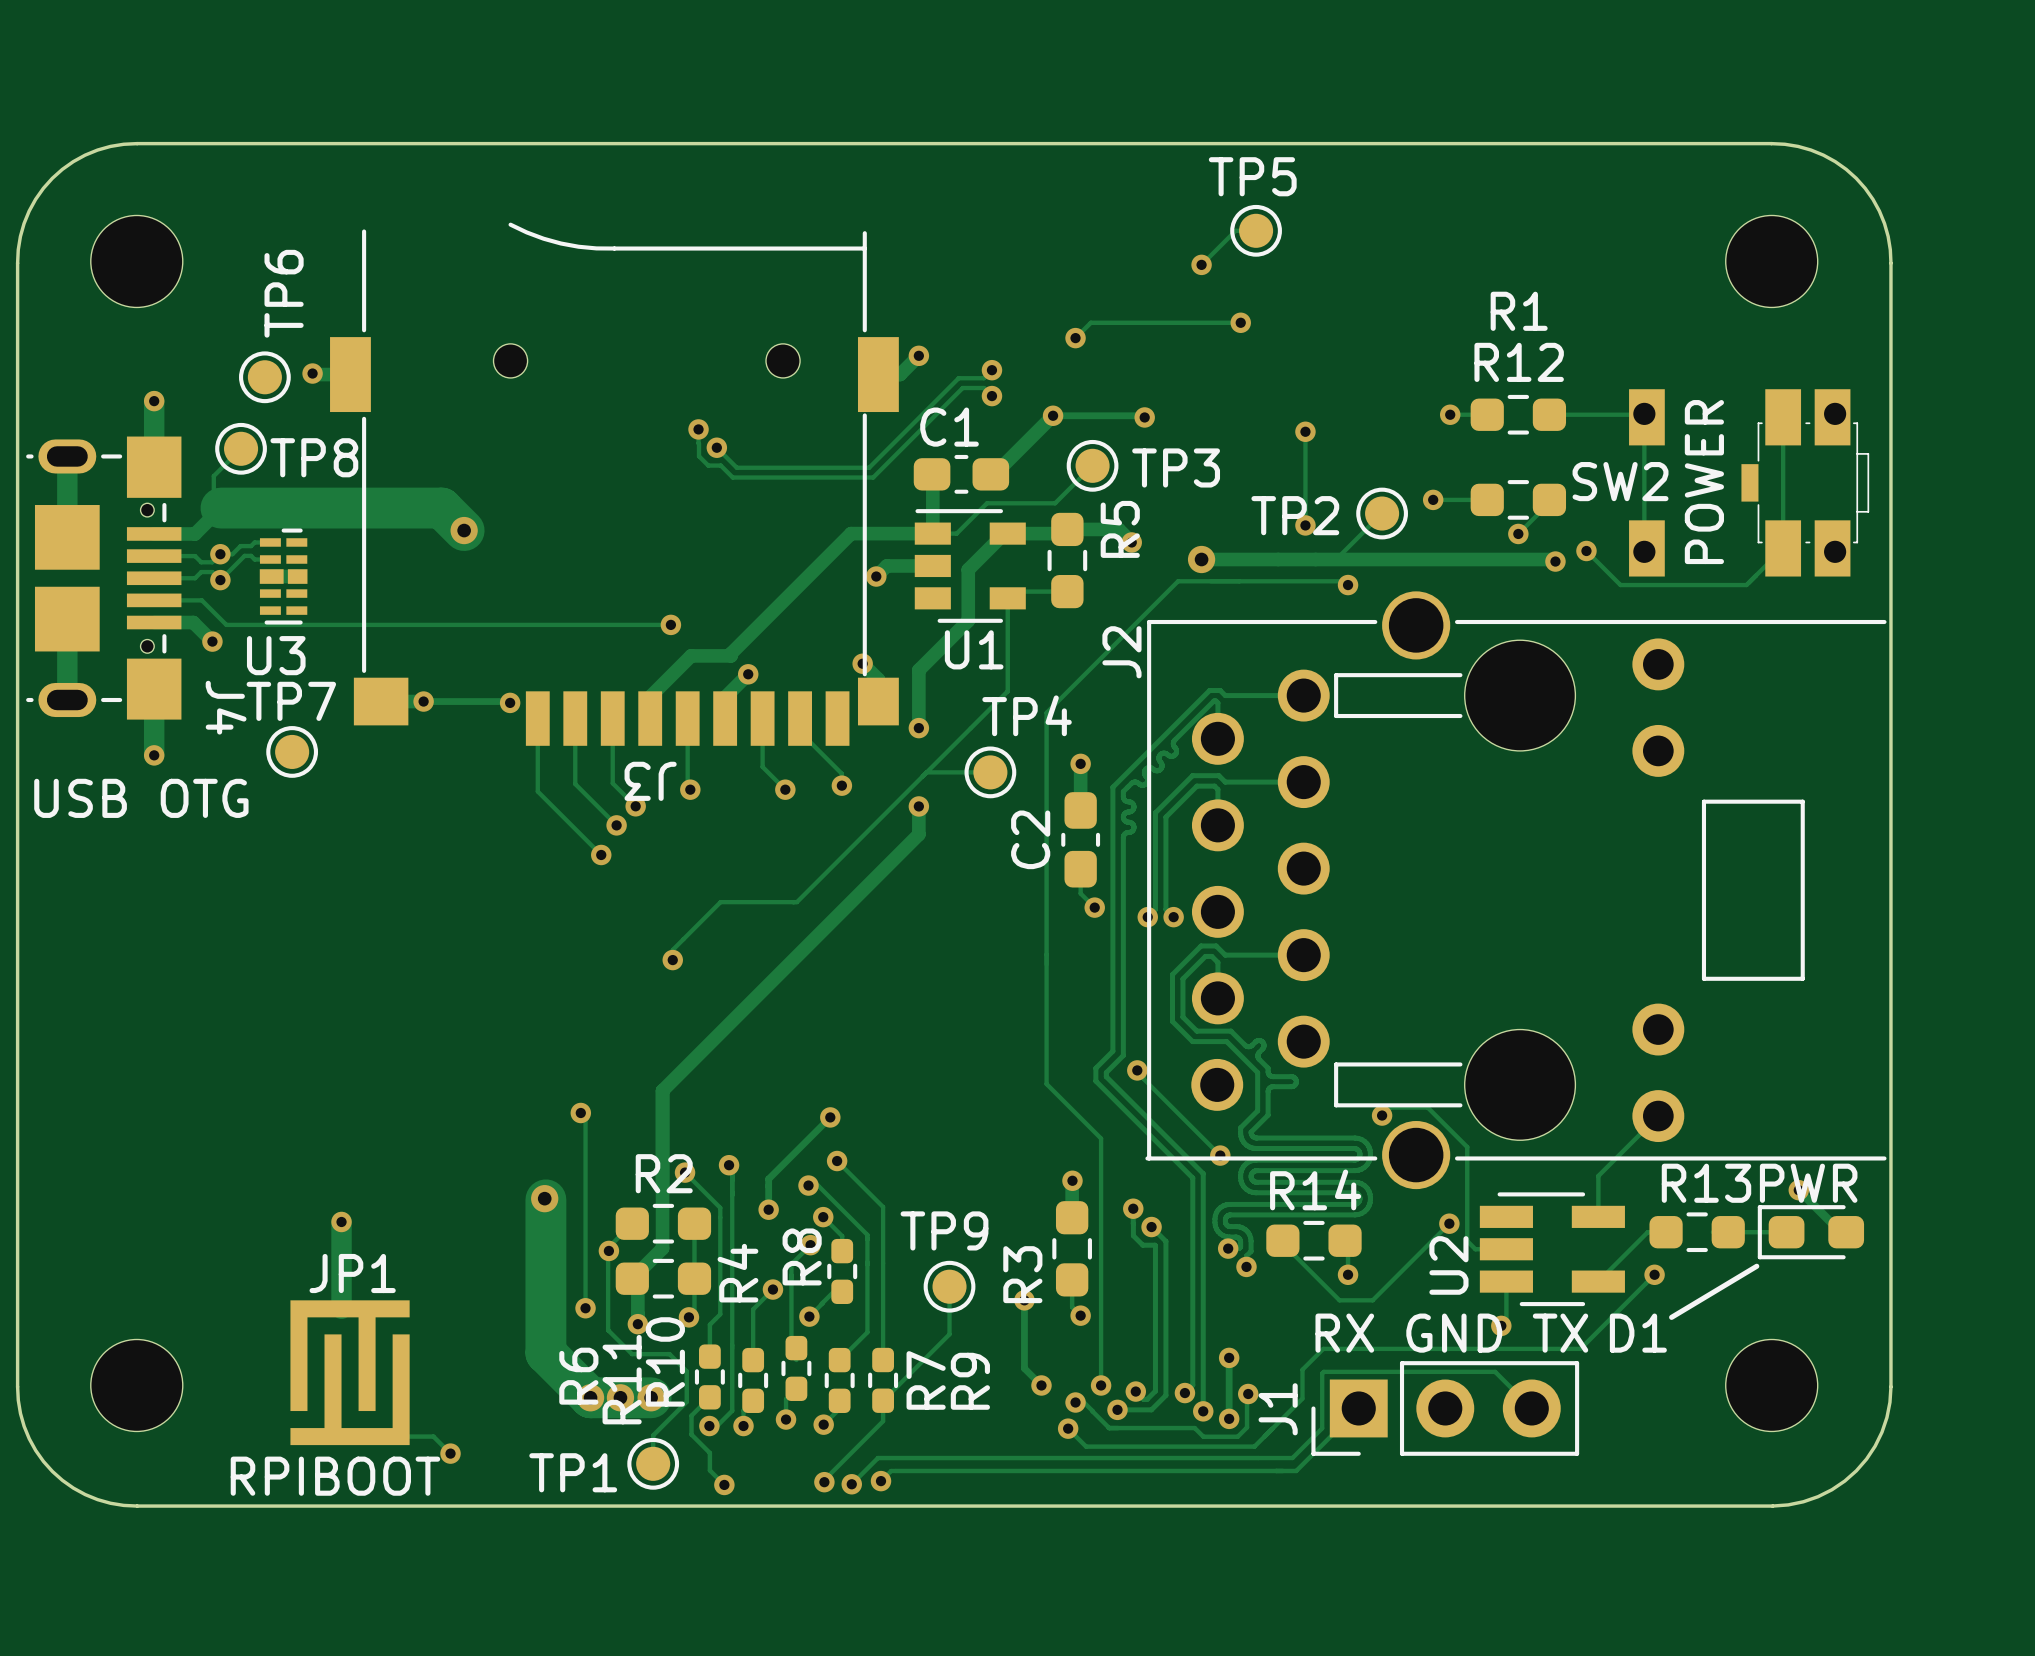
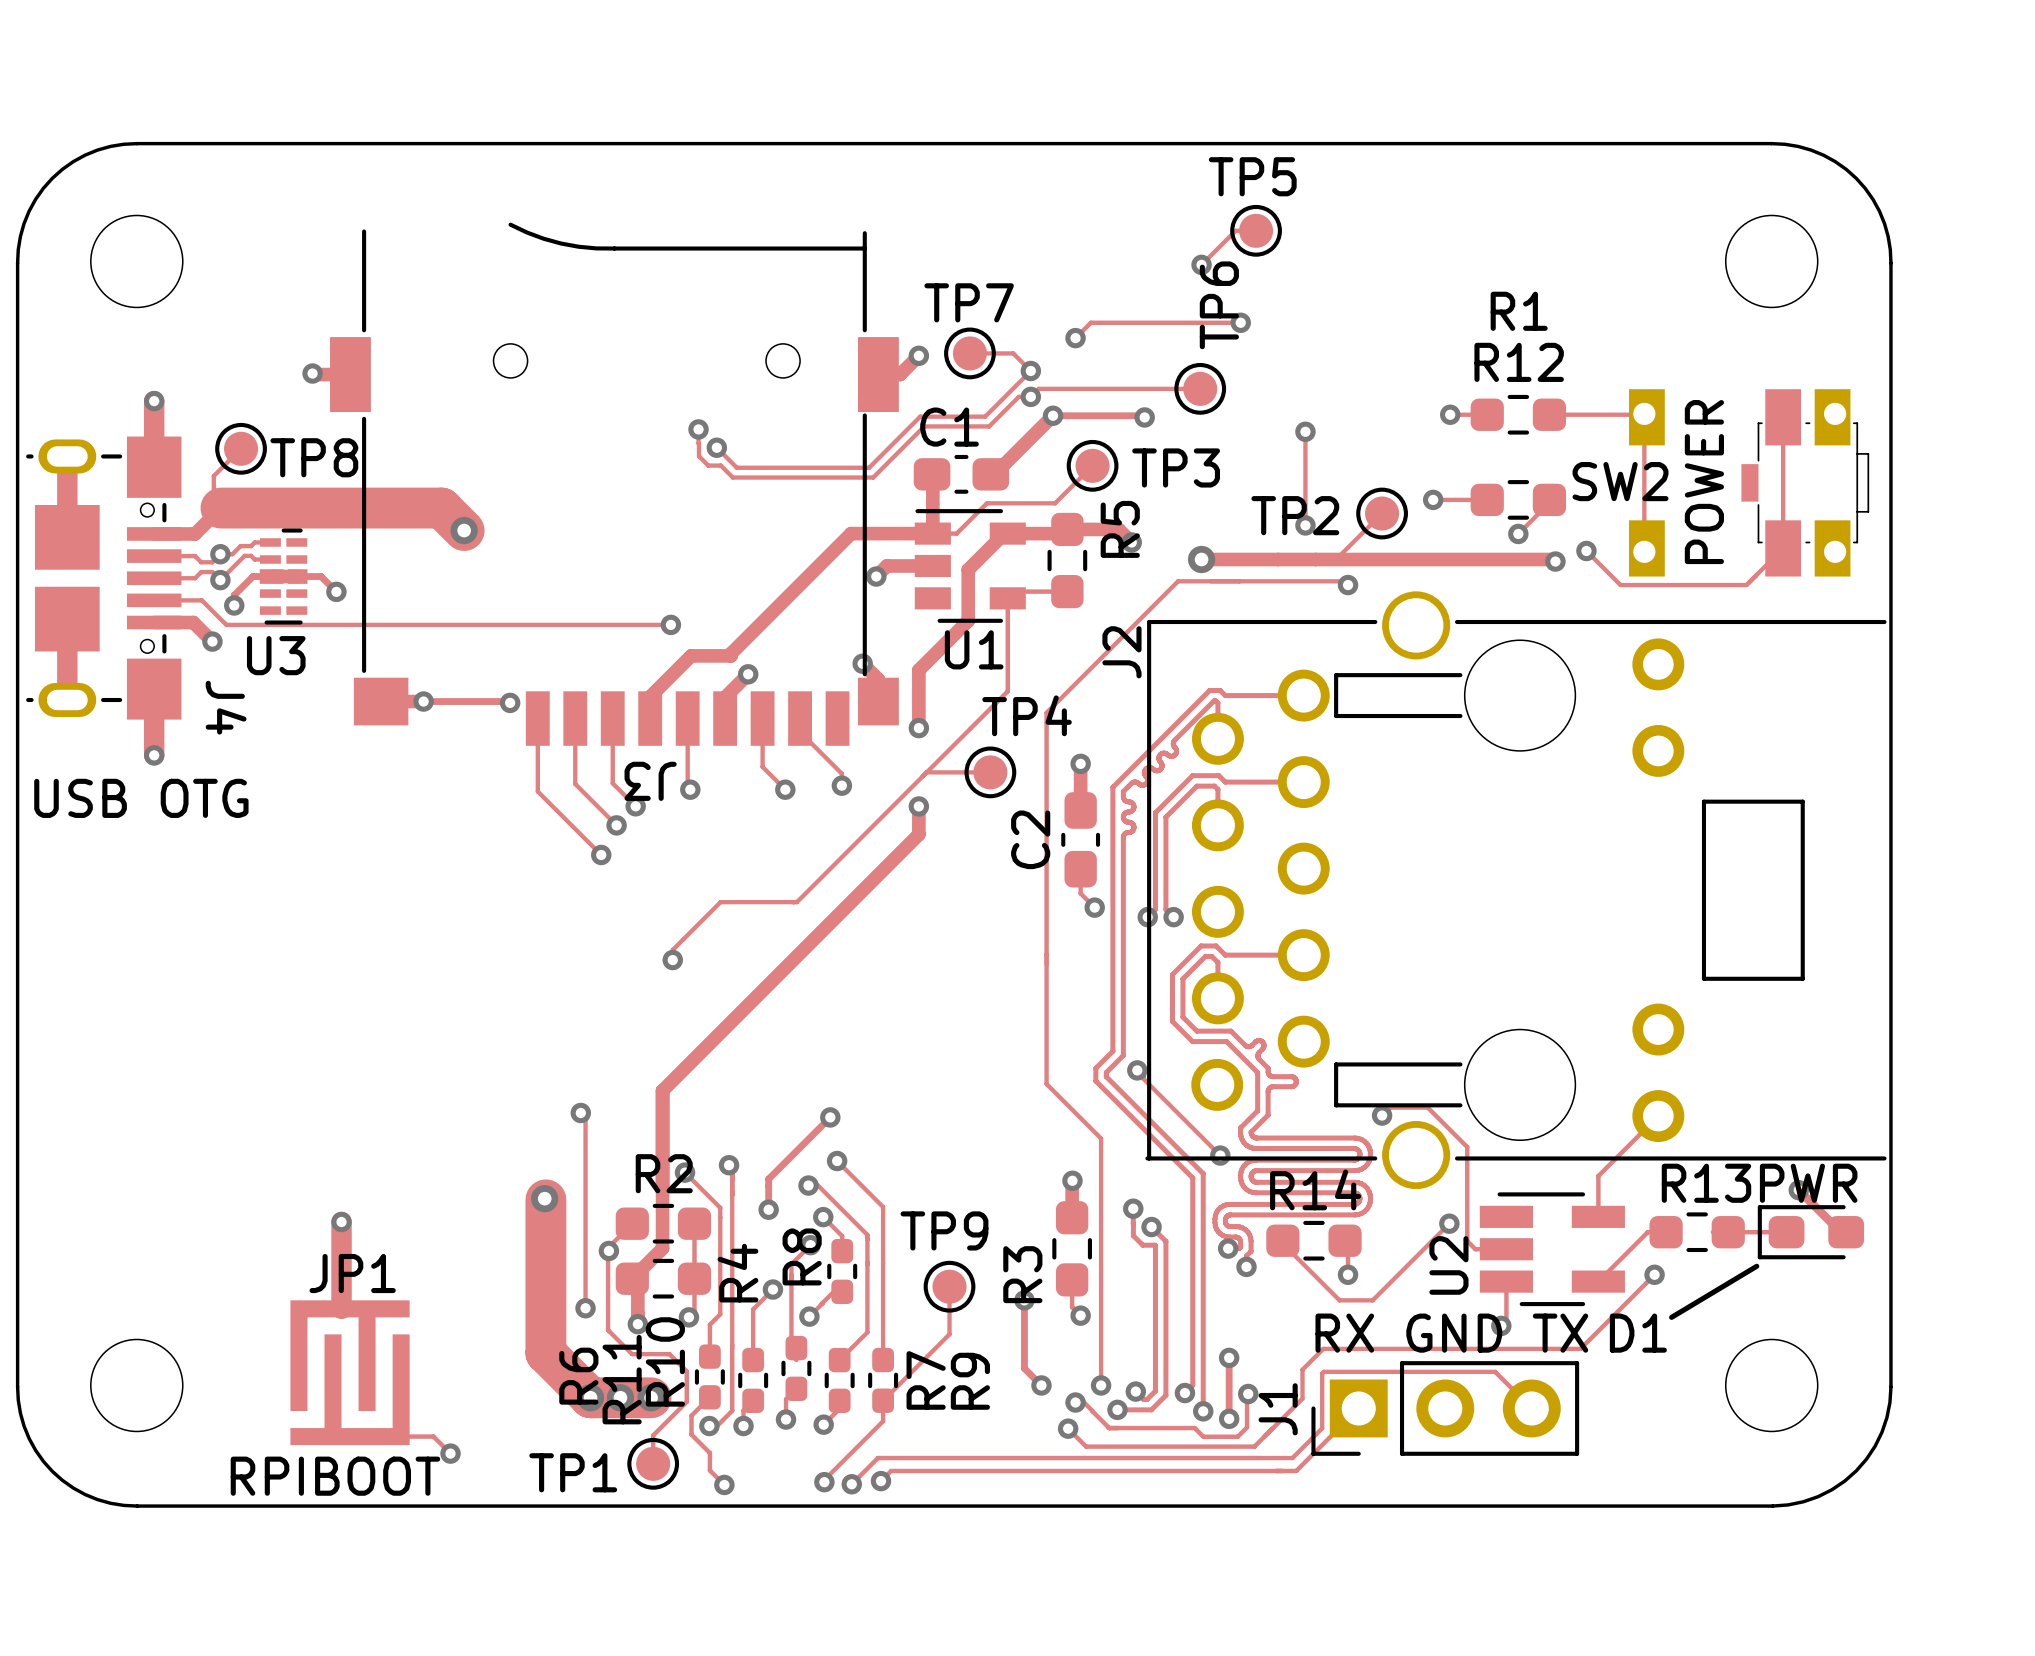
track: (991, 370) (983, 378) (958, 378) (920, 416) -> (969, 353) (1013, 353) (1030, 370) (985, 416) (920, 416)
via: (991, 370) -> none
via: none -> (1030, 370)
TP6 position: (264, 377) -> (1200, 388)
track: (991, 396) (983, 388) (962, 388) (924, 426) -> (1200, 388) (1038, 388) (1030, 396) (1018, 396) (989, 426) (924, 426)
via: (991, 396) -> none
via: none -> (1030, 396)
track: none -> (271, 576) (252, 576) (234, 595) (234, 605)
track: none -> (297, 576) (321, 576) (336, 591)
via: none -> (336, 591)
via: none -> (234, 605)
TP7 position: (292, 751) -> (969, 353)

